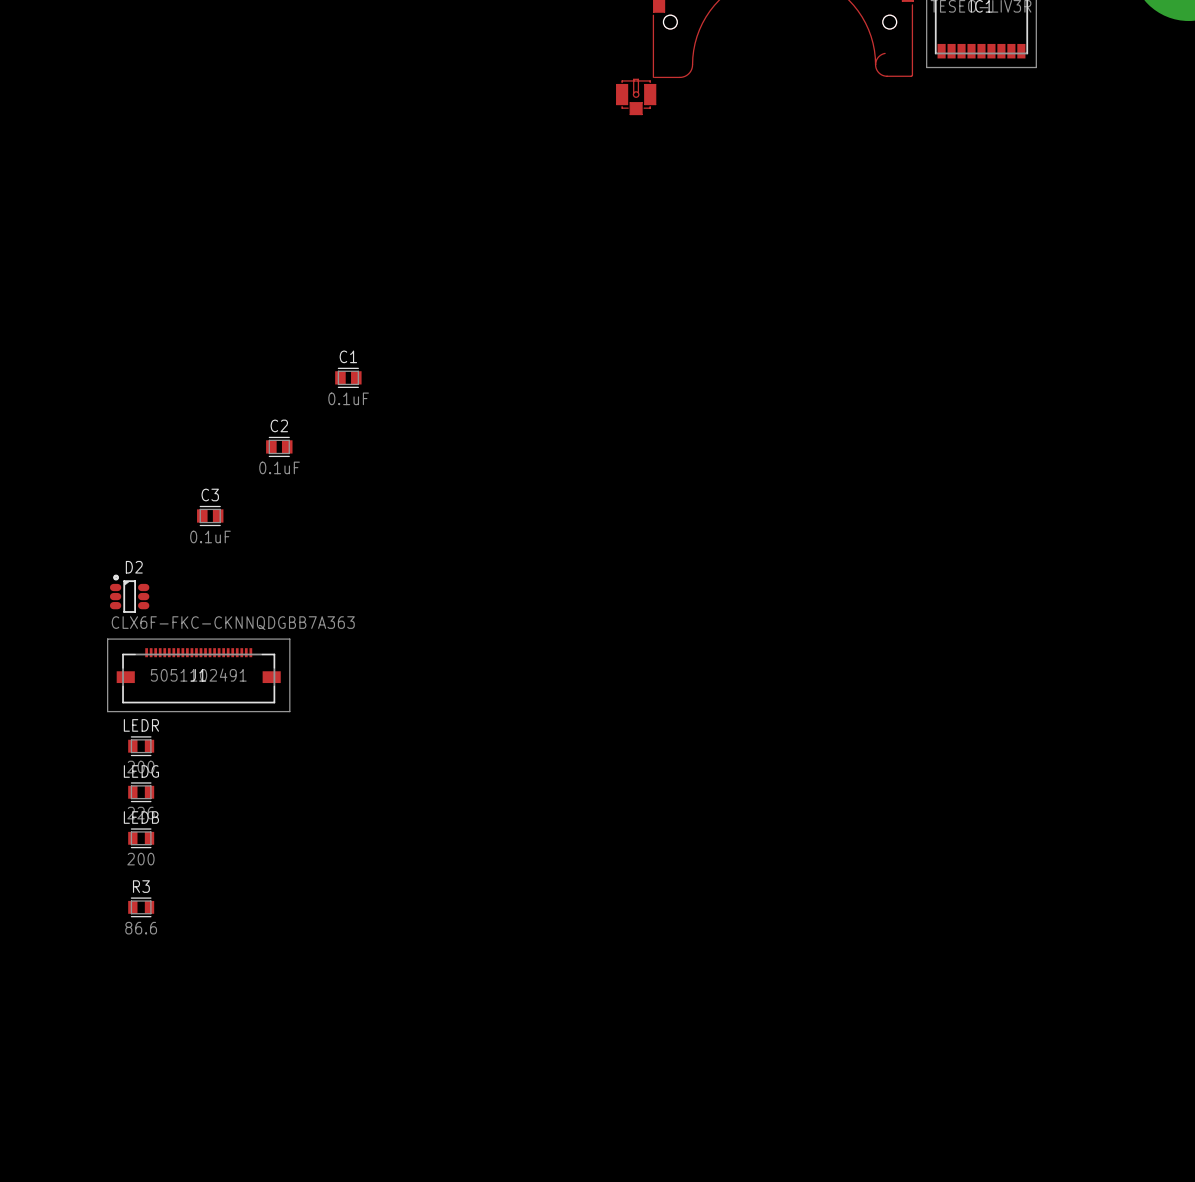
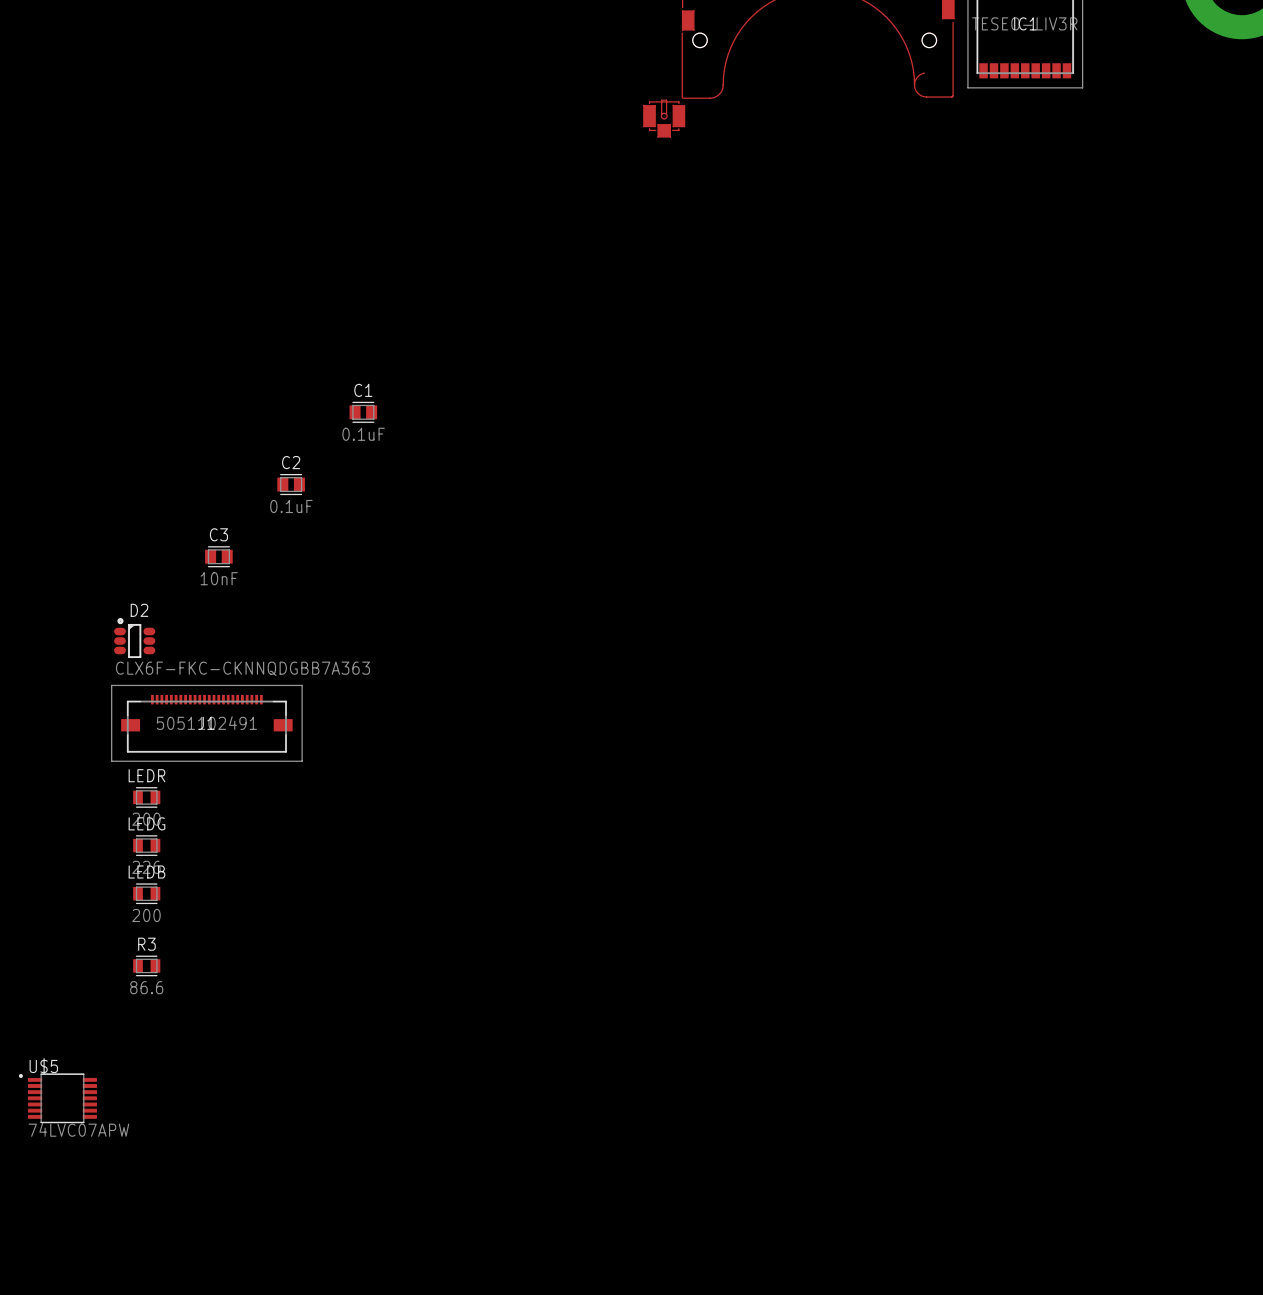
C3 value: 0.1uF (210, 536) -> 10nF (219, 578)
U$5: none -> 74LVC07APW (57, 1098)

